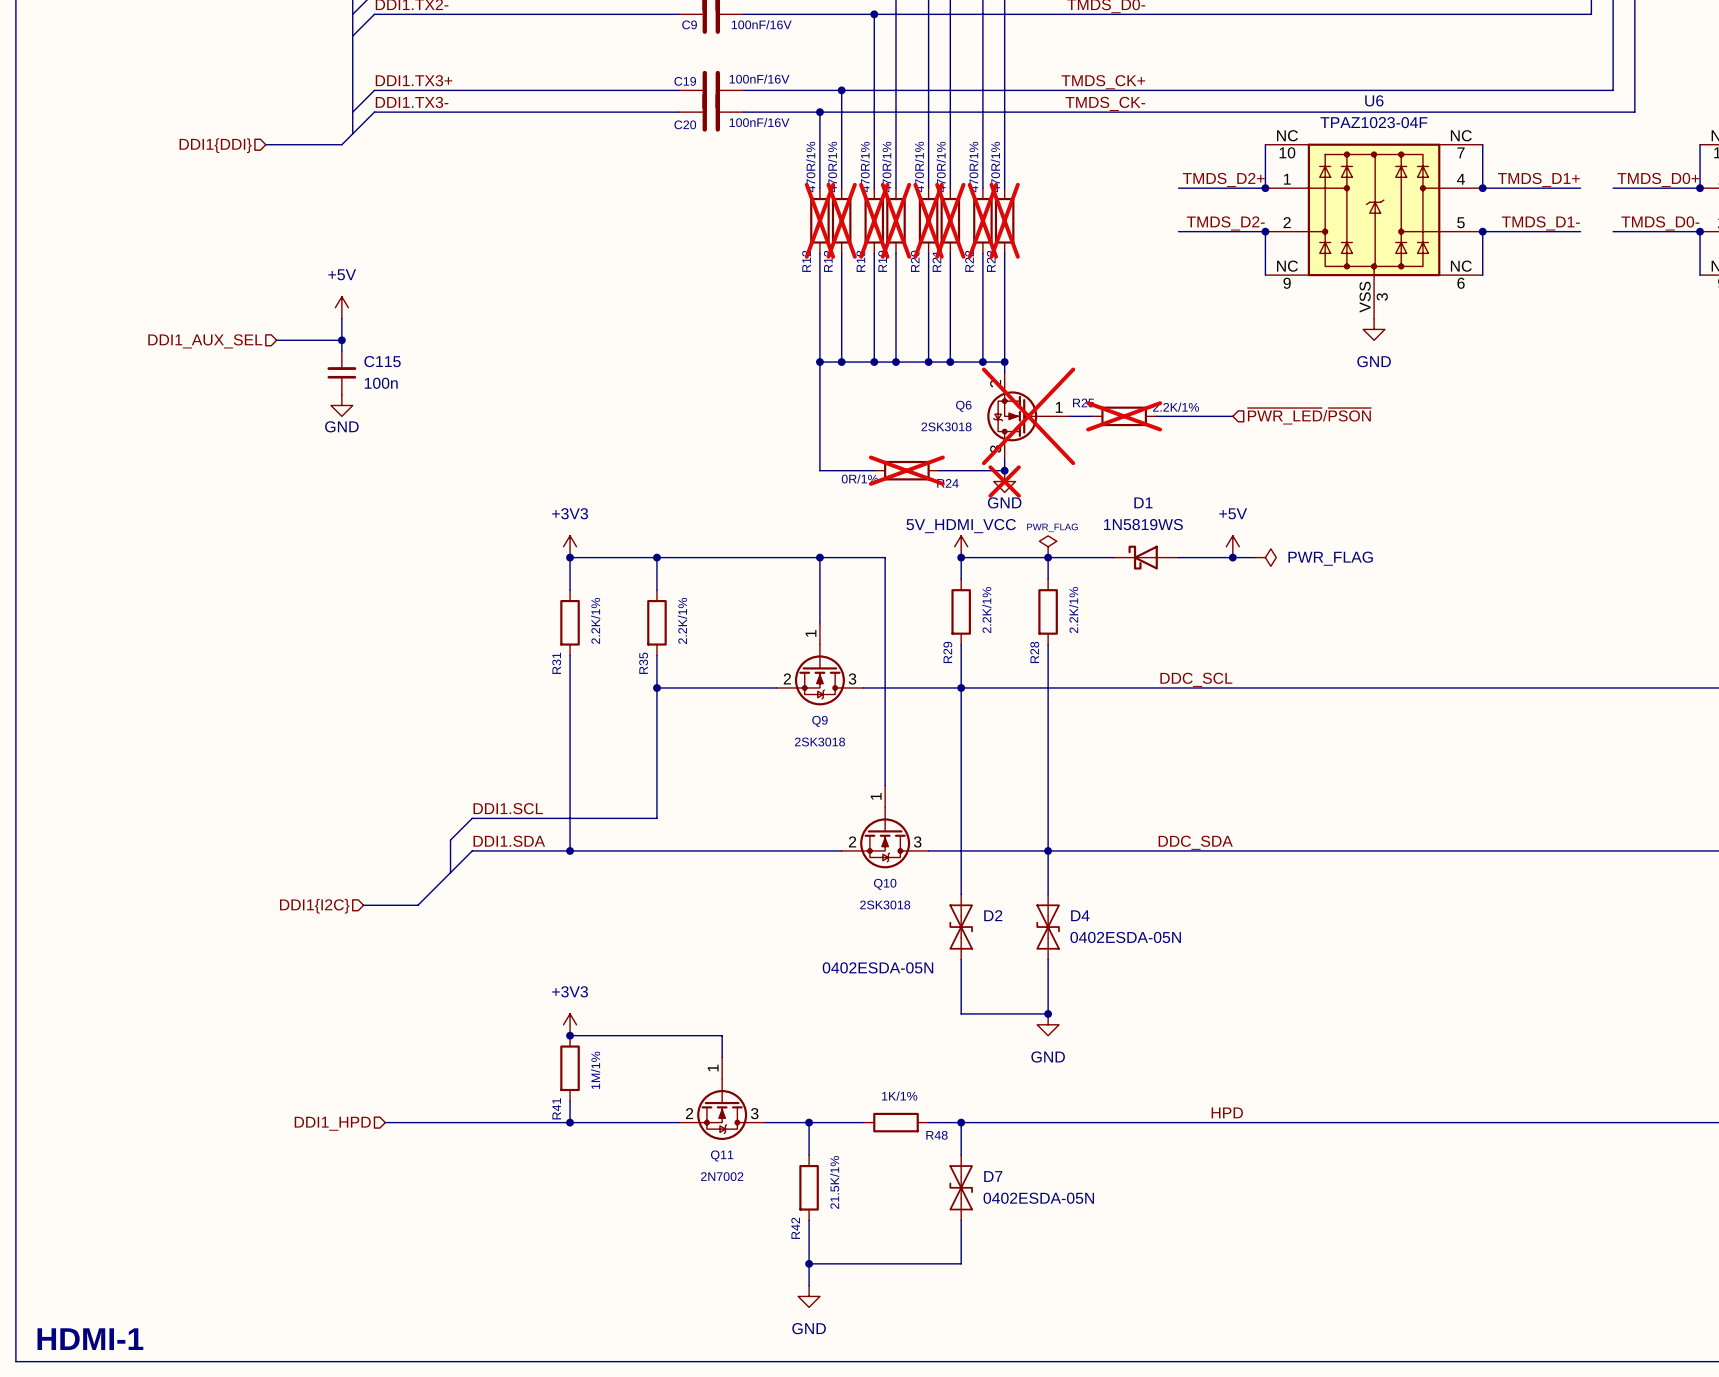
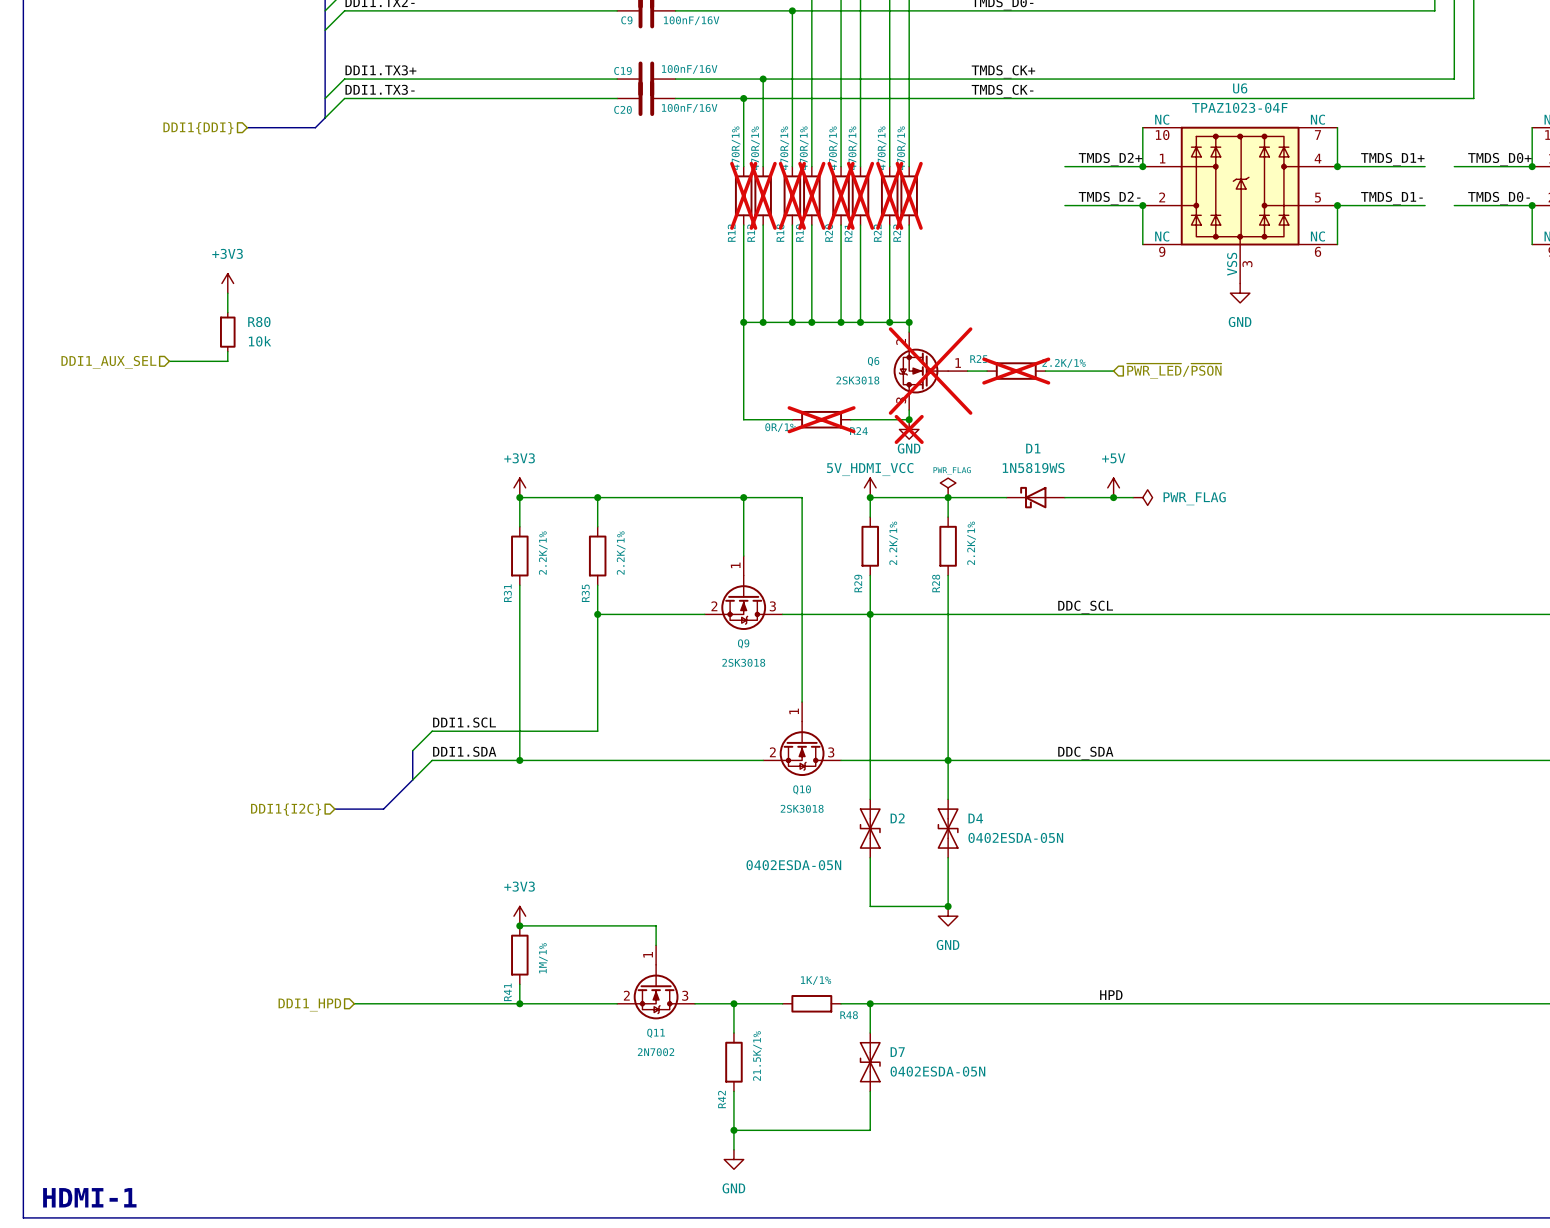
power symbol: +5V (341, 307) -> none
power symbol: none -> +3V3 (227, 283)
wire: (341, 318) (341, 351) -> none
wire: none -> (227, 293) (227, 312)
wire: (276, 340) (341, 340) -> none
junction: (341, 340) -> none
hierarchical label position: DDI1_AUX_SEL (205, 341) -> DDI1_AUX_SEL (108, 362)
R80: none -> (227, 332)
C115: (341, 372) -> none
wire: none -> (227, 351) (227, 361) (169, 361)
power symbol: GND (341, 405) -> none

